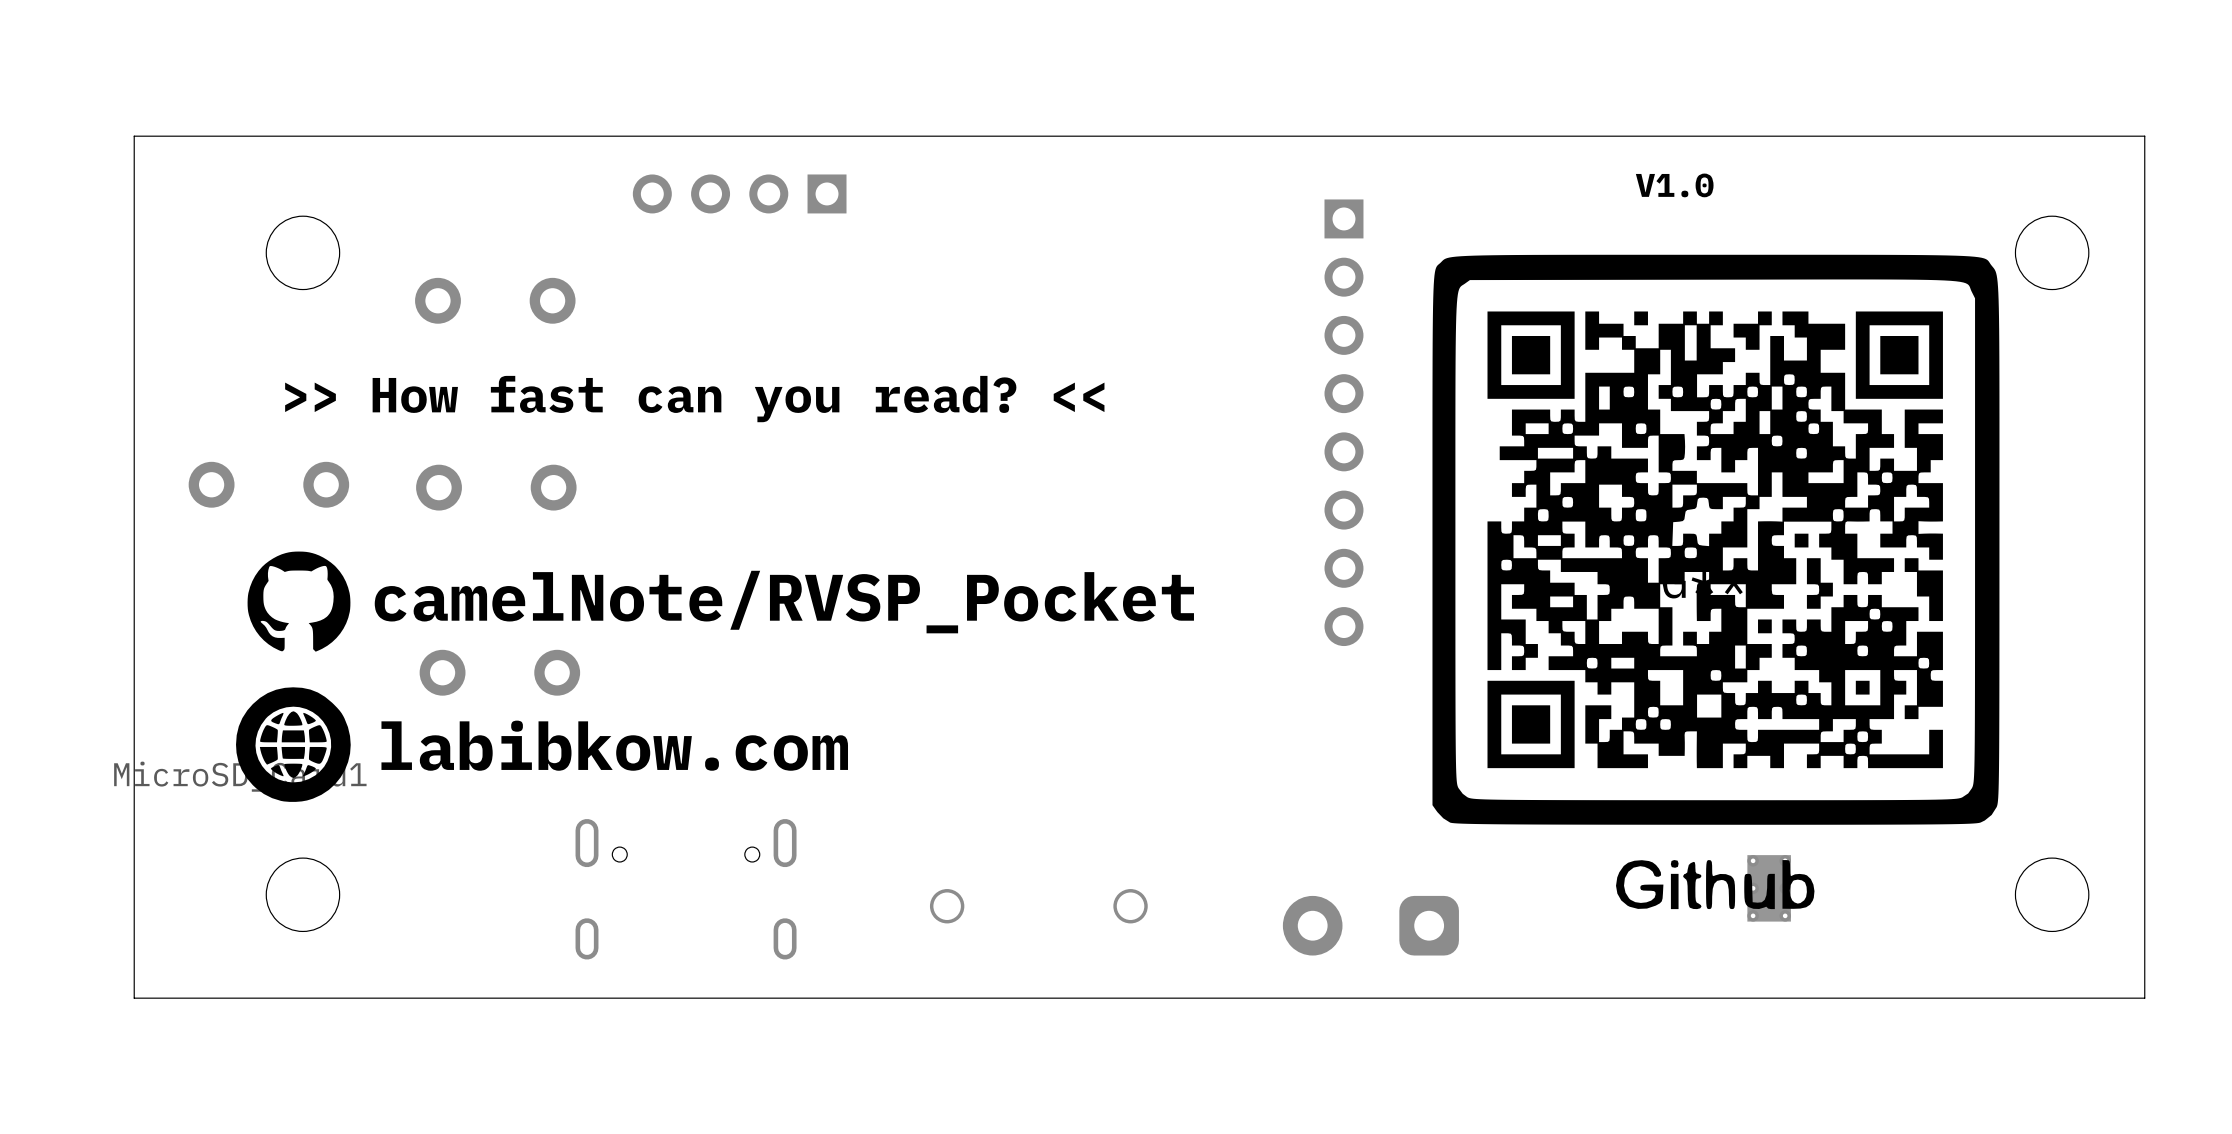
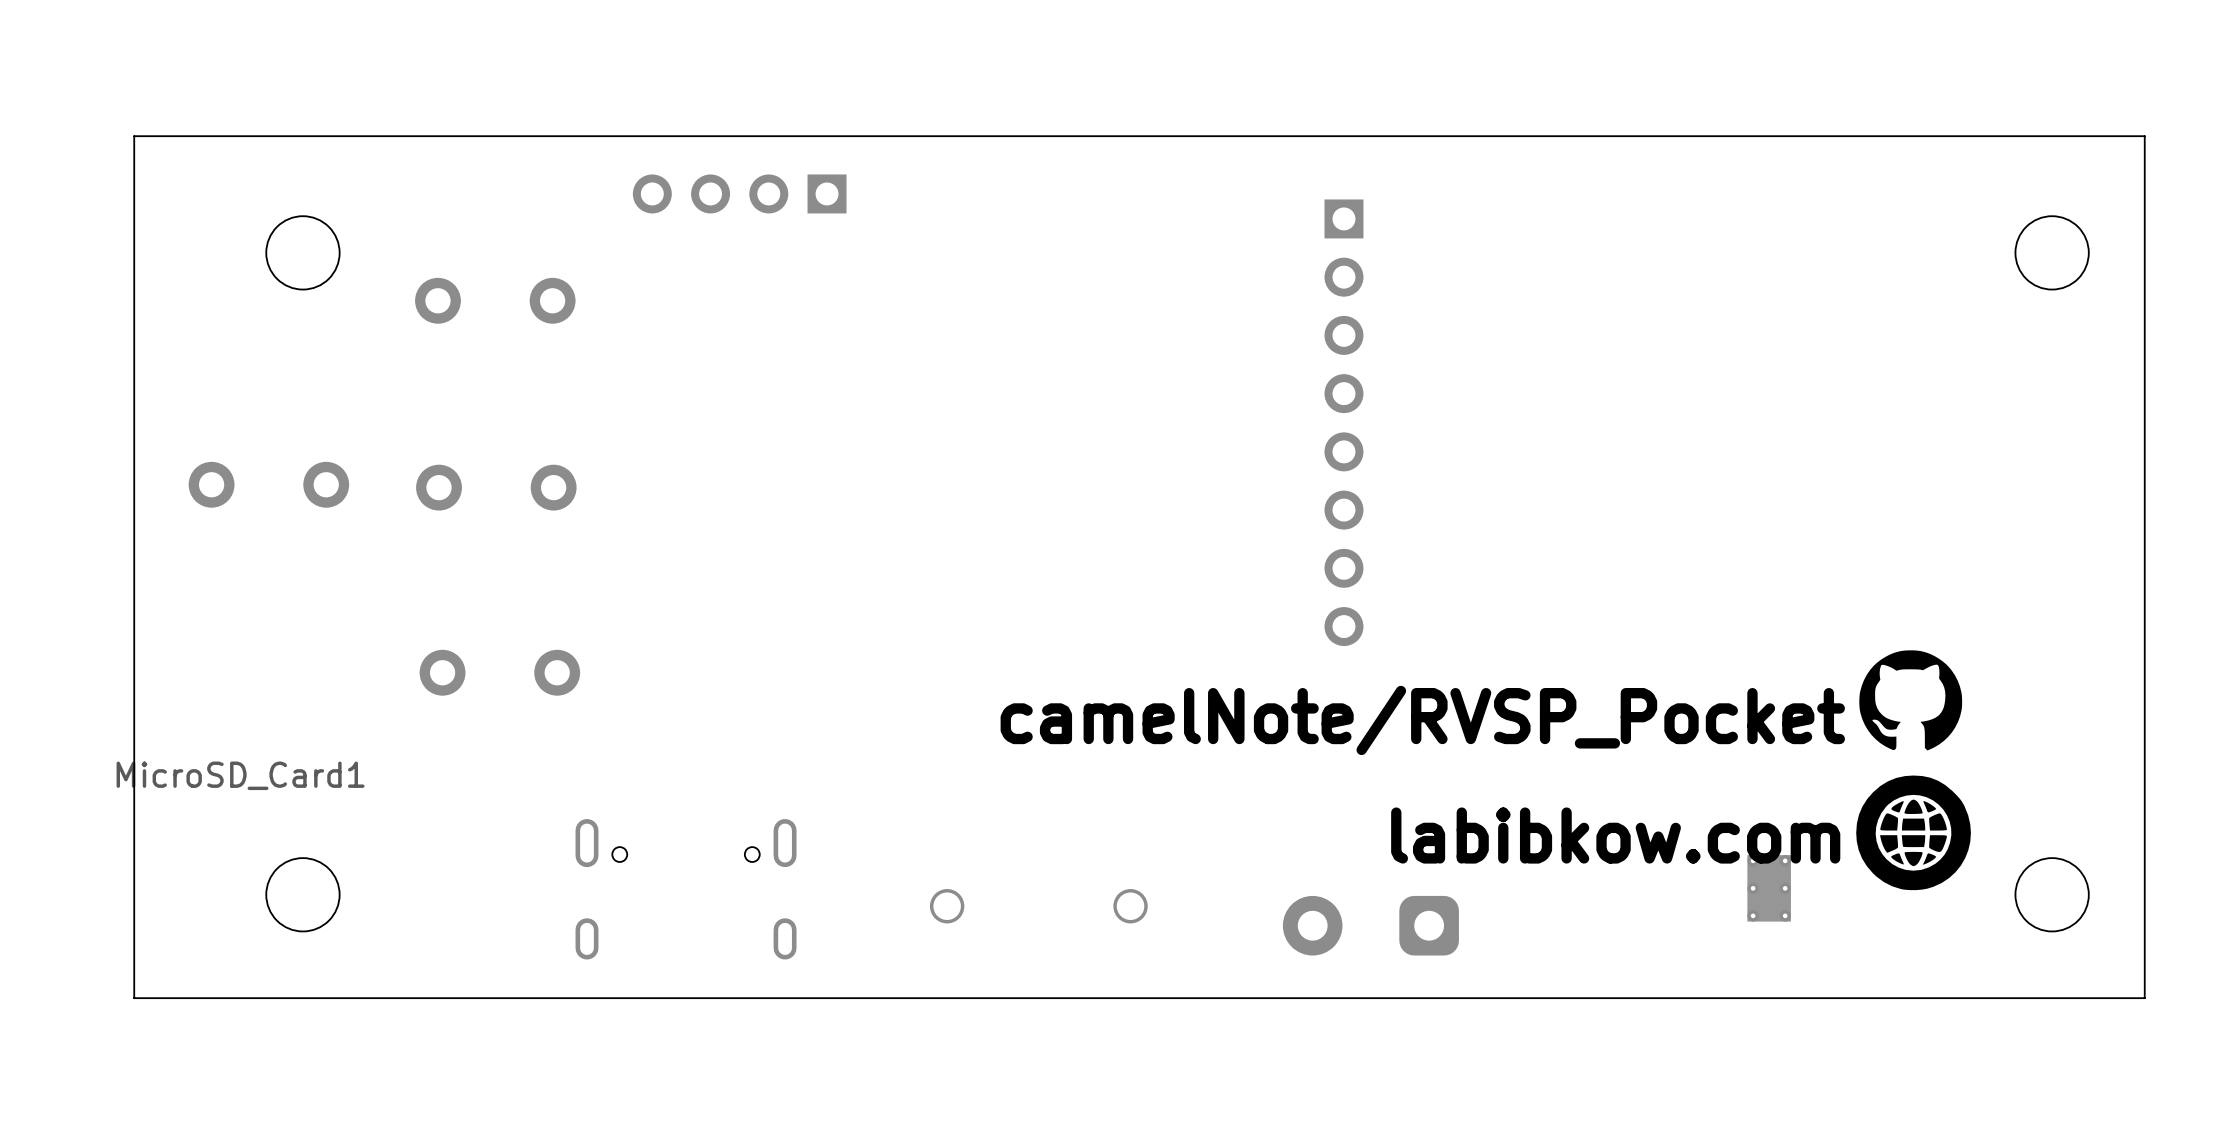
text: V1.0 (1674, 185) -> none
text: >> How fast can you read? << (694, 399) -> none
drawing: [247, 551, 351, 652] -> none
part: (1715, 581) -> none
text: camelNote/RVSP_Pocket (784, 602) -> none
drawing: none -> [1856, 650, 1971, 891]
drawing: [236, 687, 351, 802] -> none
text: none -> camelNote/RVSP_Pocket (1422, 720)
text: labibkow.com (614, 745) -> none
text: none -> labibkow.com (1615, 835)

